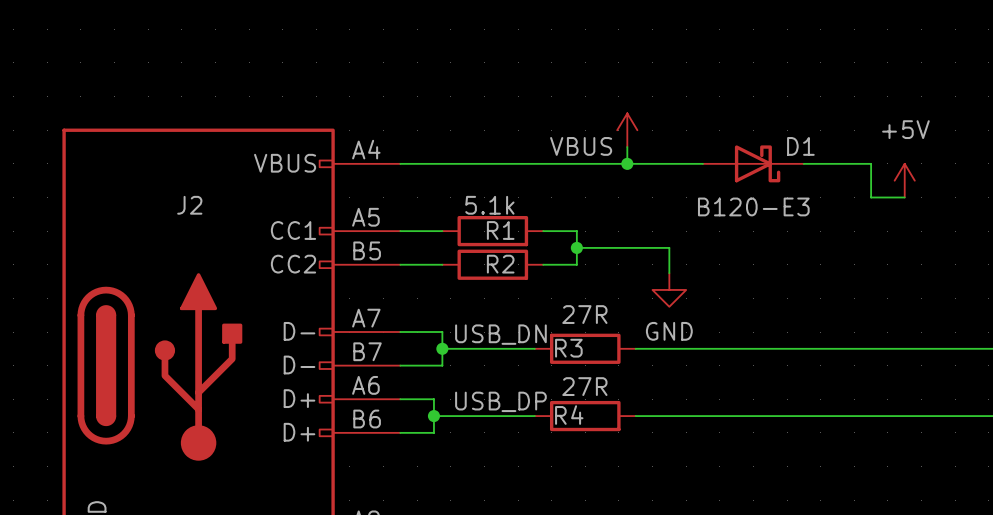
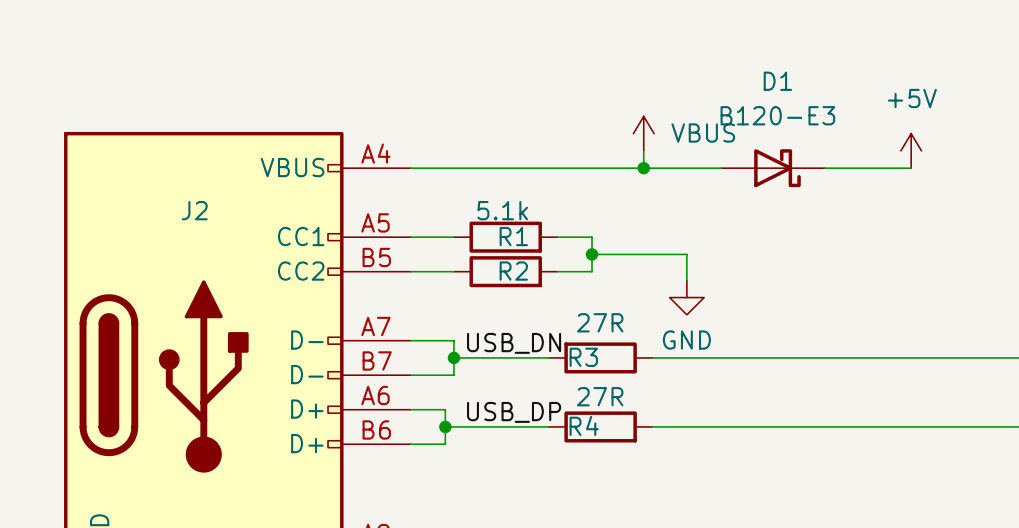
power symbol text position: VBUS (581, 146) -> VBUS (703, 133)
D1 name position: D1 (800, 146) -> D1 (777, 81)
wire: (871, 163) (871, 197) (904, 197) -> (893, 168) (911, 168)
power symbol position: +5V (904, 180) -> +5V (911, 150)
D1 value position: B120-E3 (753, 206) -> B120-E3 (777, 115)

